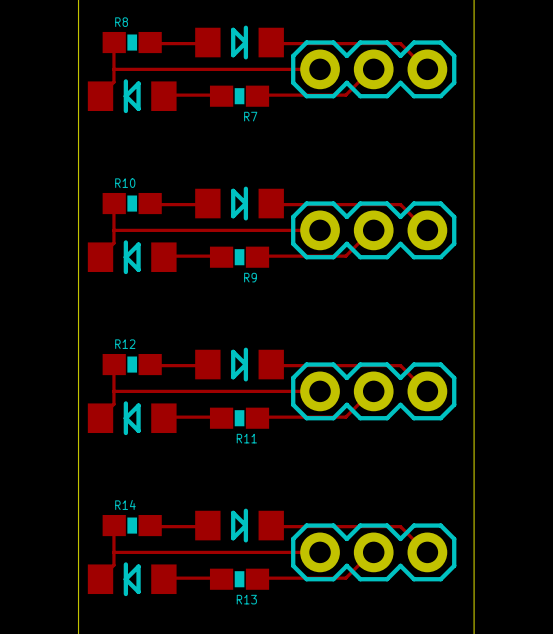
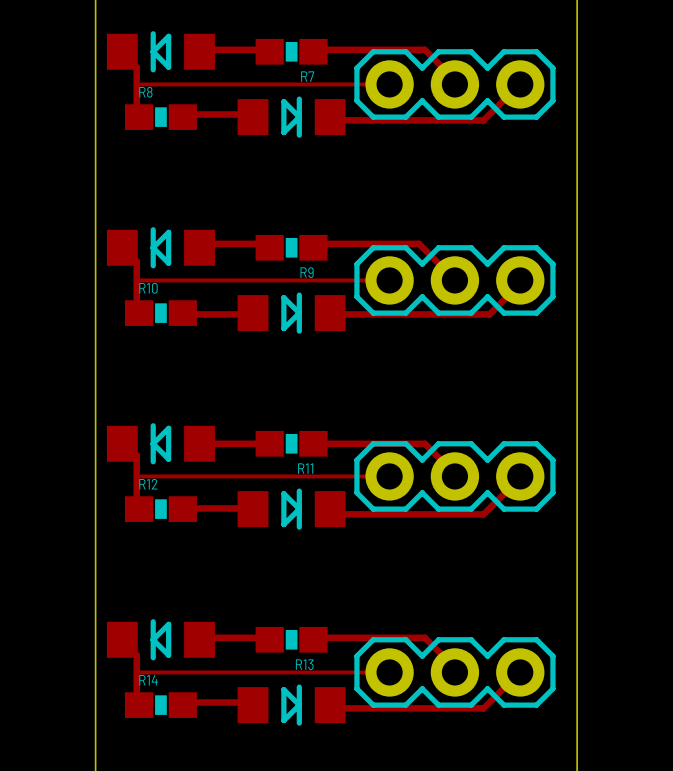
top track: none -> (122, 51) (136, 67) (136, 114) (139, 117)
top track: (114, 42) (113, 82) (100, 96) -> none
R8 position: (132, 42) -> (160, 117)
part: none -> (160, 51)
top track: (150, 42) (207, 42) -> none
top track: none -> (199, 51) (201, 49) (266, 49) (269, 51)
part: (239, 42) -> none
top track: (271, 42) (400, 43) (427, 69) -> (330, 117) (330, 120) (483, 120) (520, 84)
top track: (373, 69) (345, 95) (257, 96) -> (454, 84) (454, 79) (424, 49) (319, 49) (313, 51)
part: (132, 96) -> none
top track: none -> (182, 117) (183, 114) (248, 114) (253, 117)
top track: (163, 96) (221, 96) -> none
R7 position: (239, 96) -> (291, 51)
part: none -> (291, 117)
top track: none -> (122, 247) (136, 261) (136, 308) (139, 313)
top track: (114, 203) (113, 243) (100, 257) -> none
R10 position: (132, 203) -> (160, 313)
part: none -> (160, 247)
top track: (150, 203) (207, 203) -> none
top track: none -> (199, 247) (201, 243) (266, 243) (269, 247)
part: (239, 203) -> none
top track: (271, 203) (400, 204) (427, 230) -> (330, 313) (489, 314) (518, 285) (520, 280)
top track: (373, 230) (345, 256) (257, 257) -> (454, 280) (419, 243) (319, 243) (313, 247)
part: (132, 257) -> none
top track: none -> (182, 313) (253, 313)
top track: (163, 257) (221, 257) -> none
R9 position: (239, 257) -> (291, 247)
part: none -> (291, 313)
top track: none -> (122, 443) (125, 443) (136, 455) (136, 508) (139, 509)
top track: (114, 364) (113, 404) (100, 418) -> none
R12 position: (132, 364) -> (160, 509)
part: none -> (160, 443)
top track: (150, 364) (207, 364) -> none
top track: none -> (199, 443) (269, 443)
part: (239, 364) -> none
top track: (271, 364) (400, 365) (427, 391) -> (330, 509) (330, 514) (483, 514) (520, 476)
top track: (373, 391) (345, 417) (257, 418) -> (454, 476) (454, 473) (424, 443) (313, 443)
part: (132, 418) -> none
top track: none -> (182, 509) (253, 509)
top track: (163, 418) (221, 418) -> none
R11 position: (239, 418) -> (291, 443)
part: none -> (291, 509)
top track: none -> (122, 639) (136, 655) (136, 702) (139, 705)
top track: (114, 525) (113, 565) (100, 579) -> none
R14 position: (132, 525) -> (160, 705)
part: none -> (160, 639)
top track: (150, 525) (207, 525) -> none
top track: none -> (199, 639) (201, 637) (266, 637) (269, 639)
part: (239, 525) -> none
top track: (271, 525) (400, 526) (427, 552) -> (330, 705) (330, 708) (483, 708) (520, 672)
top track: (373, 552) (345, 578) (257, 579) -> (454, 672) (454, 667) (424, 637) (319, 637) (313, 639)
part: (132, 579) -> none
top track: none -> (182, 705) (183, 702) (248, 702) (253, 705)
top track: (163, 579) (221, 579) -> none
R13 position: (239, 579) -> (291, 639)
part: none -> (291, 705)

